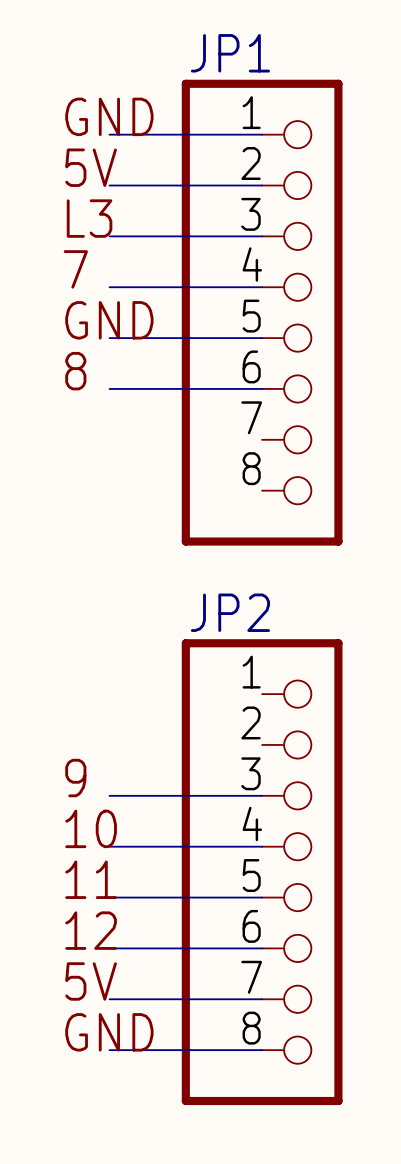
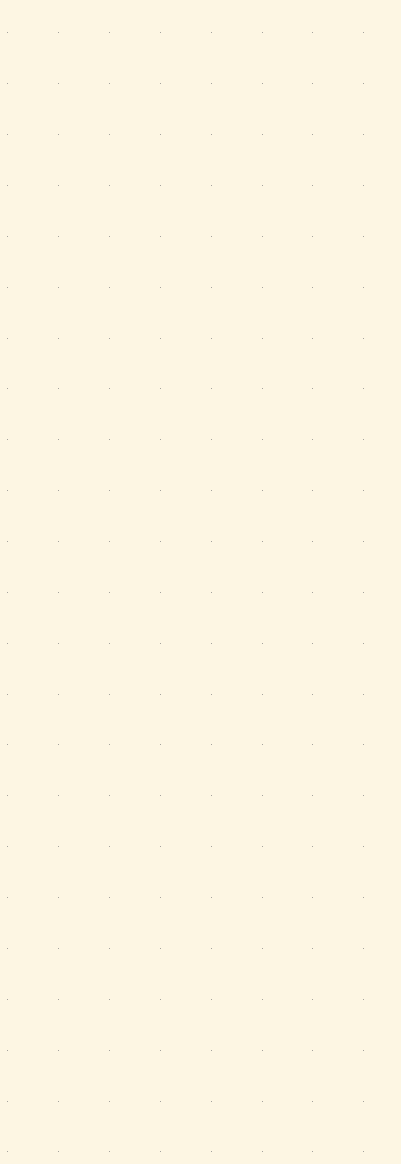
label: GND (109, 116) -> none
wire: (109, 134) (262, 134) -> none
label: 5V (91, 167) -> none
wire: (109, 185) (262, 185) -> none
label: L3 (89, 218) -> none
wire: (109, 236) (262, 236) -> none
label: 7 (75, 269) -> none
wire: (109, 287) (262, 287) -> none
JP1: (262, 312) -> none
label: GND (109, 320) -> none
wire: (109, 338) (262, 338) -> none
label: 8 (75, 371) -> none
wire: (109, 388) (262, 388) -> none
label: 9 (75, 778) -> none
wire: (109, 795) (262, 795) -> none
label: 10 (91, 828) -> none
wire: (109, 846) (262, 846) -> none
JP2: (262, 872) -> none
label: 11 (91, 879) -> none
wire: (109, 897) (262, 897) -> none
label: 12 (91, 930) -> none
wire: (109, 948) (262, 948) -> none
label: 5V (91, 981) -> none
wire: (109, 999) (262, 999) -> none
label: GND (109, 1032) -> none
wire: (109, 1050) (262, 1050) -> none

